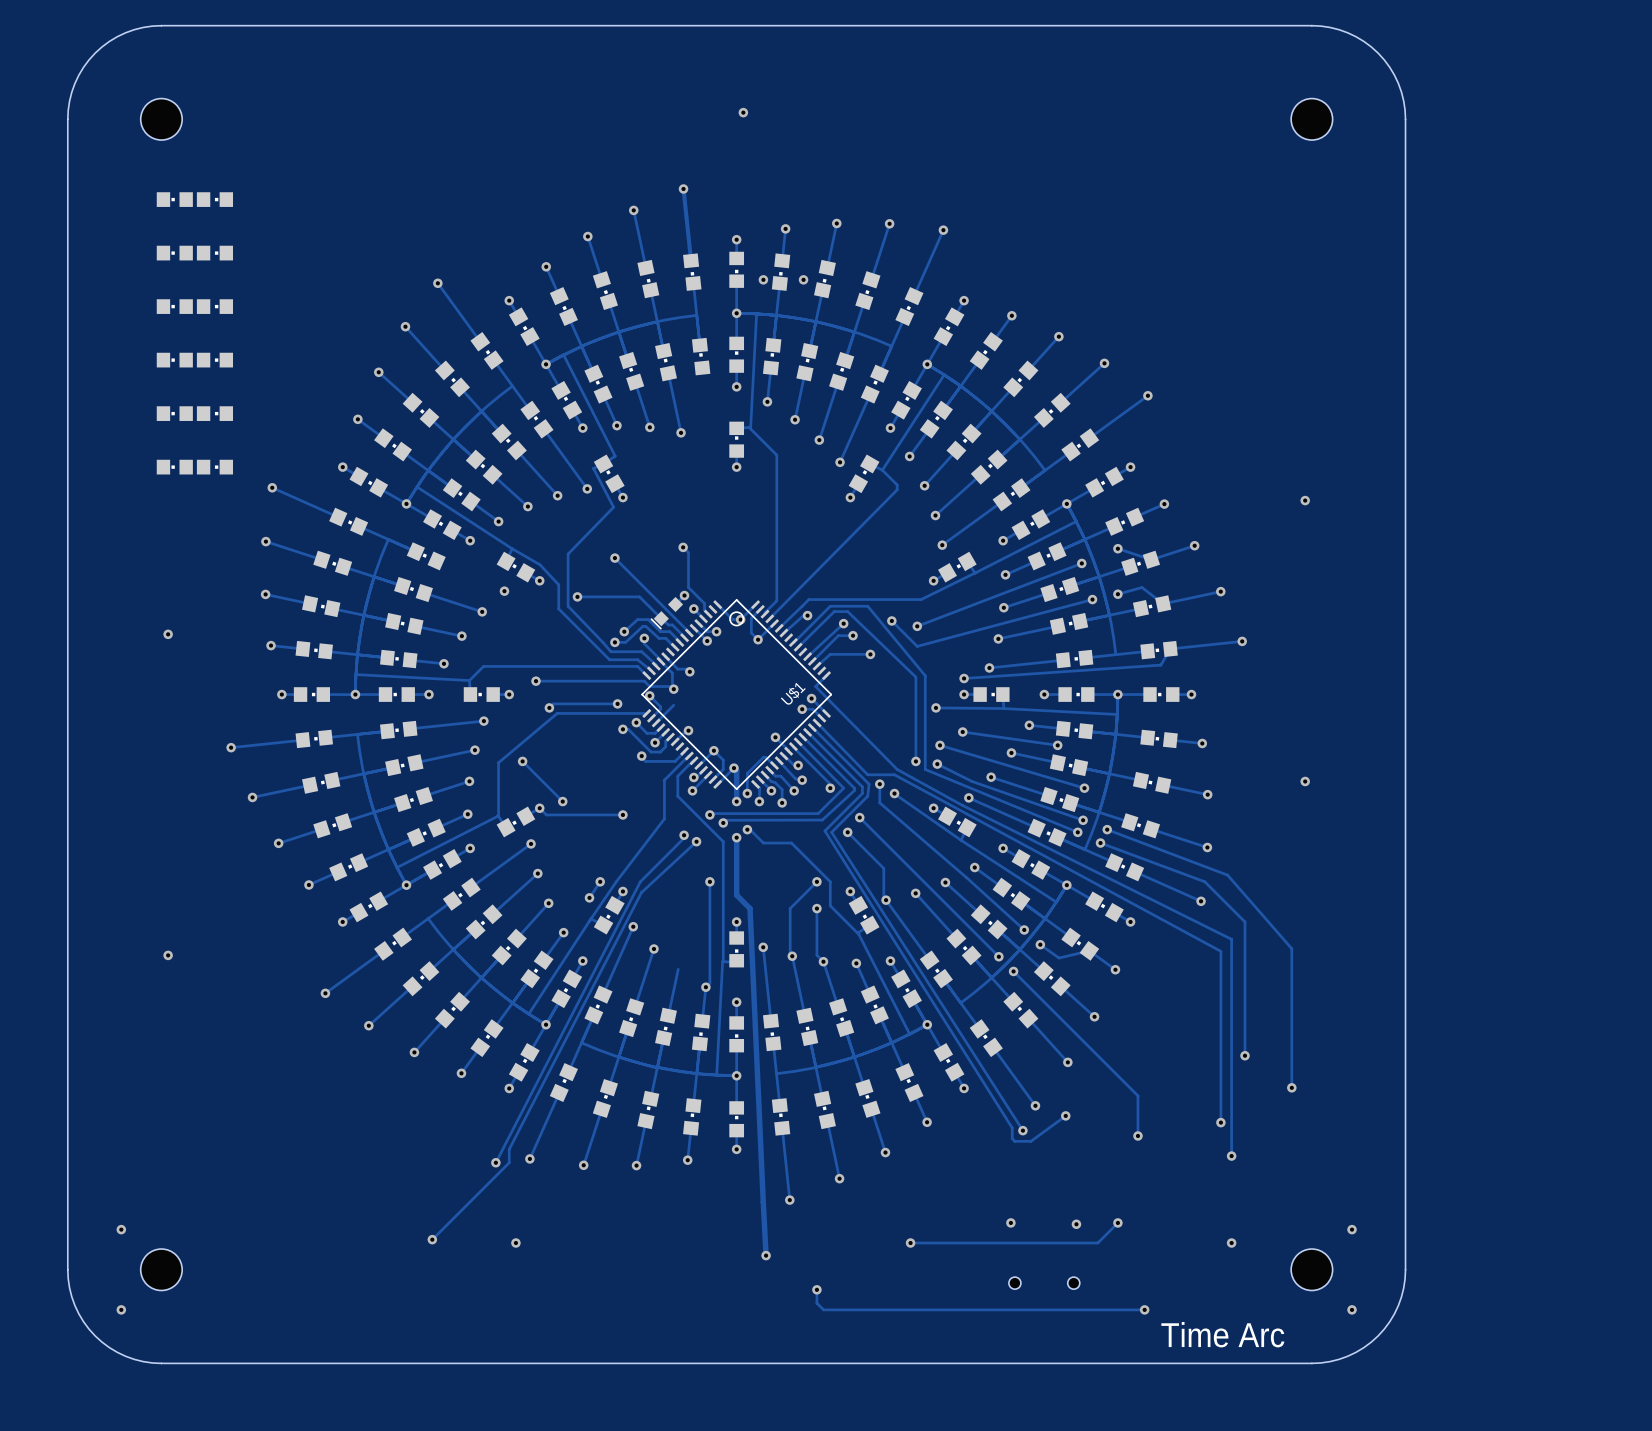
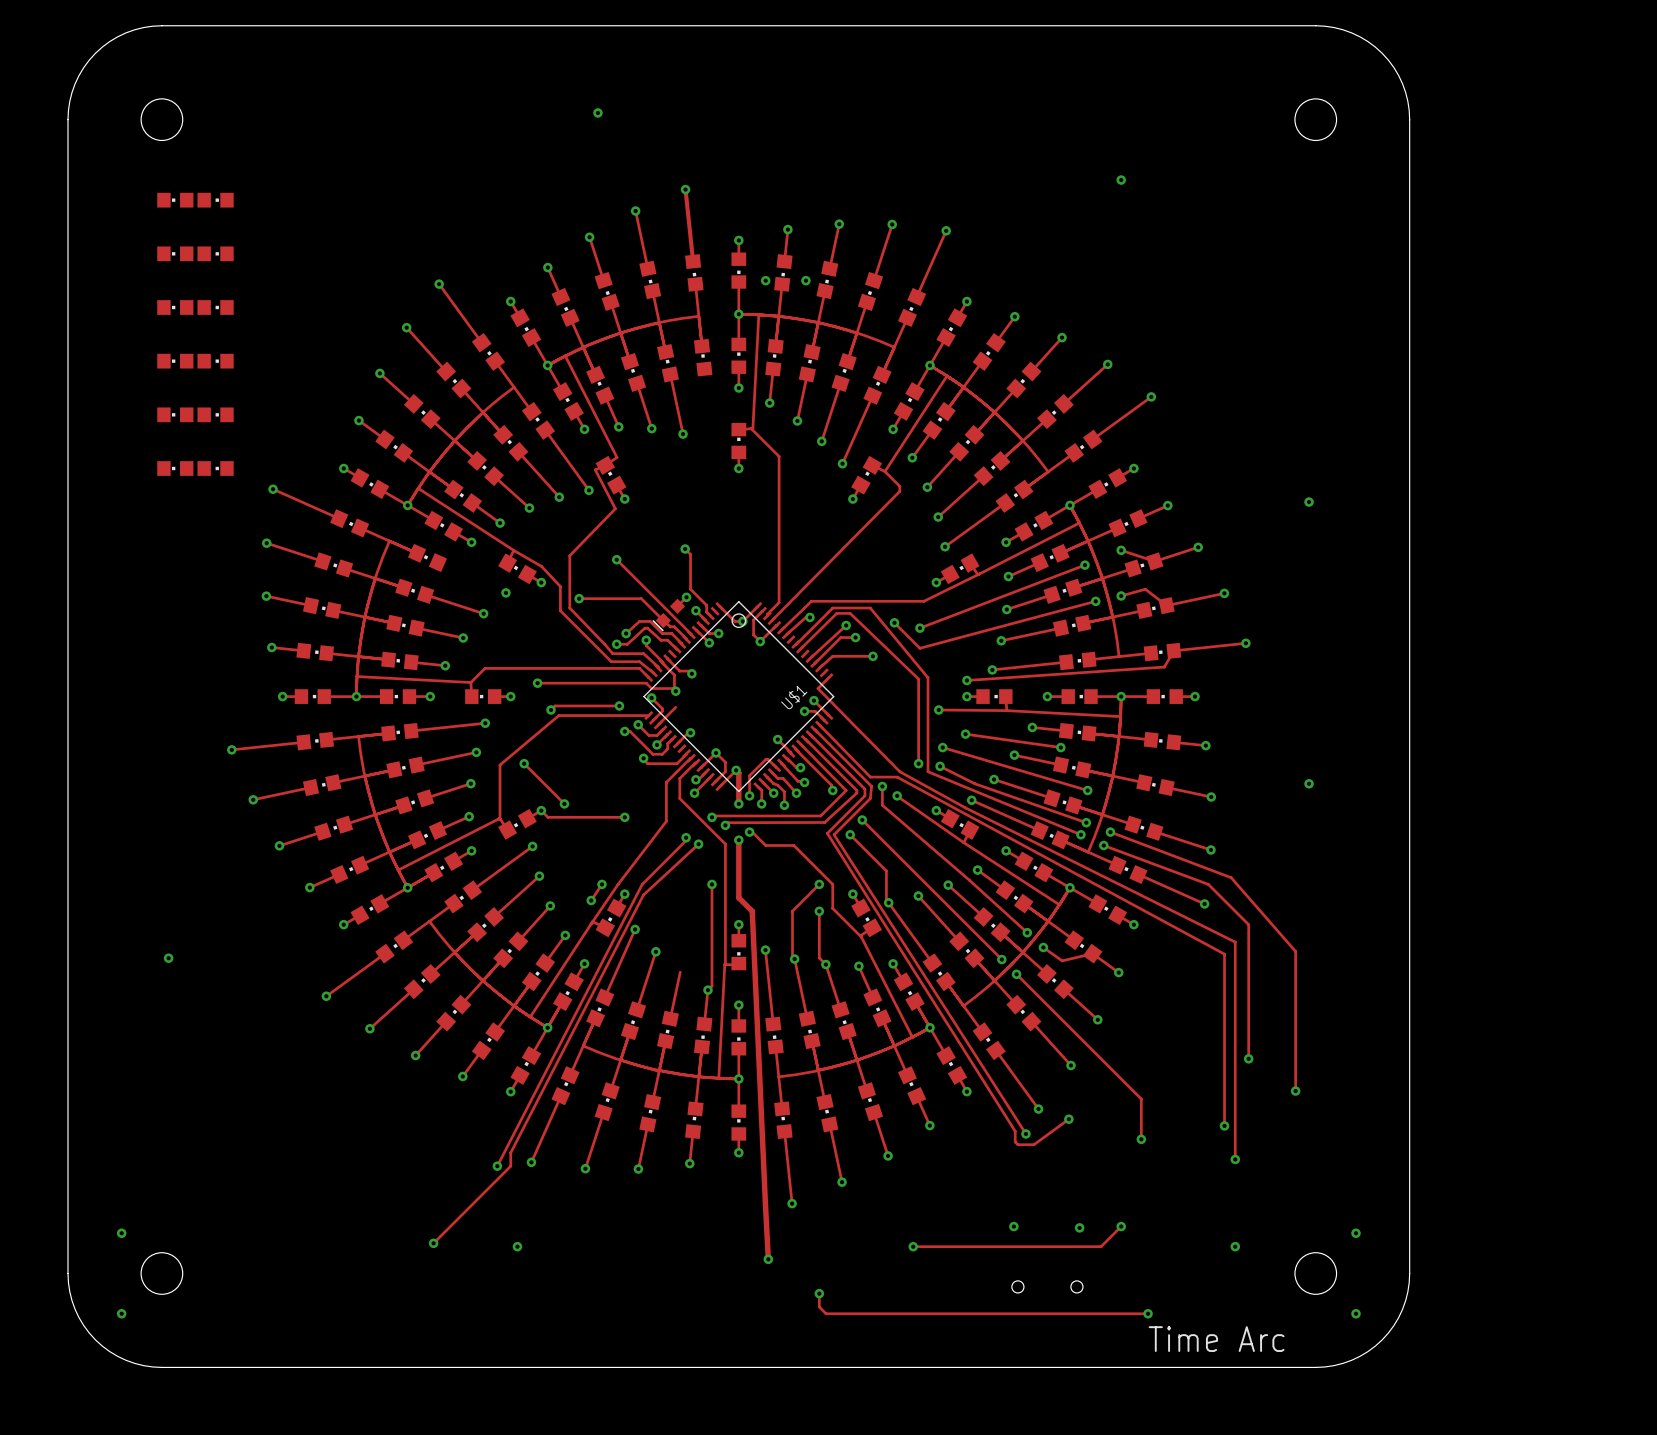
via: none -> (597, 112)
via: (743, 112) -> none
via: none -> (1121, 180)
via: (168, 634) -> none

